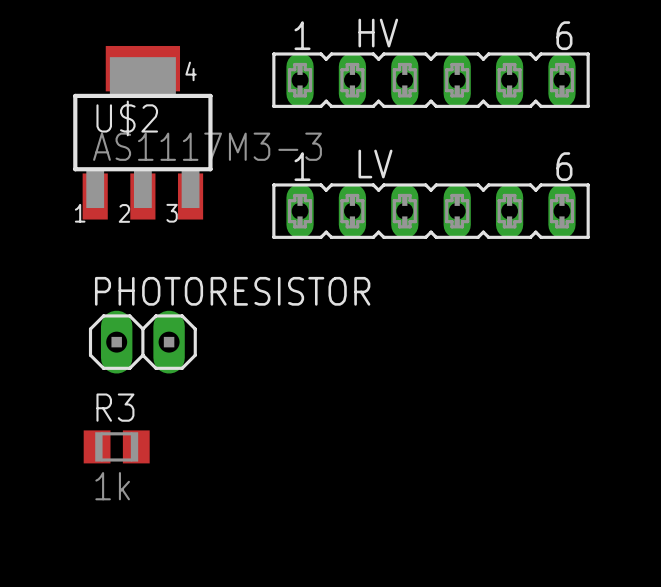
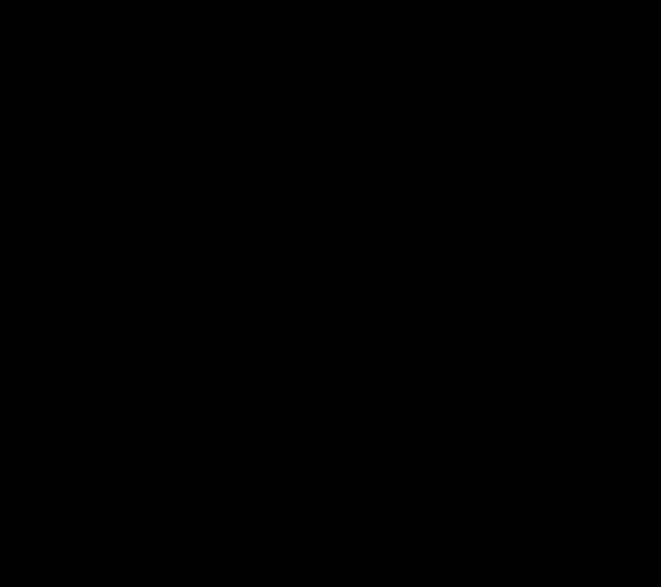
HV: (431, 80) -> none
U$2: AS1117M3-3 (142, 132) -> none
LV: (431, 211) -> none
PHOTORESISTOR: (142, 342) -> none
R3: 1k (116, 446) -> none

